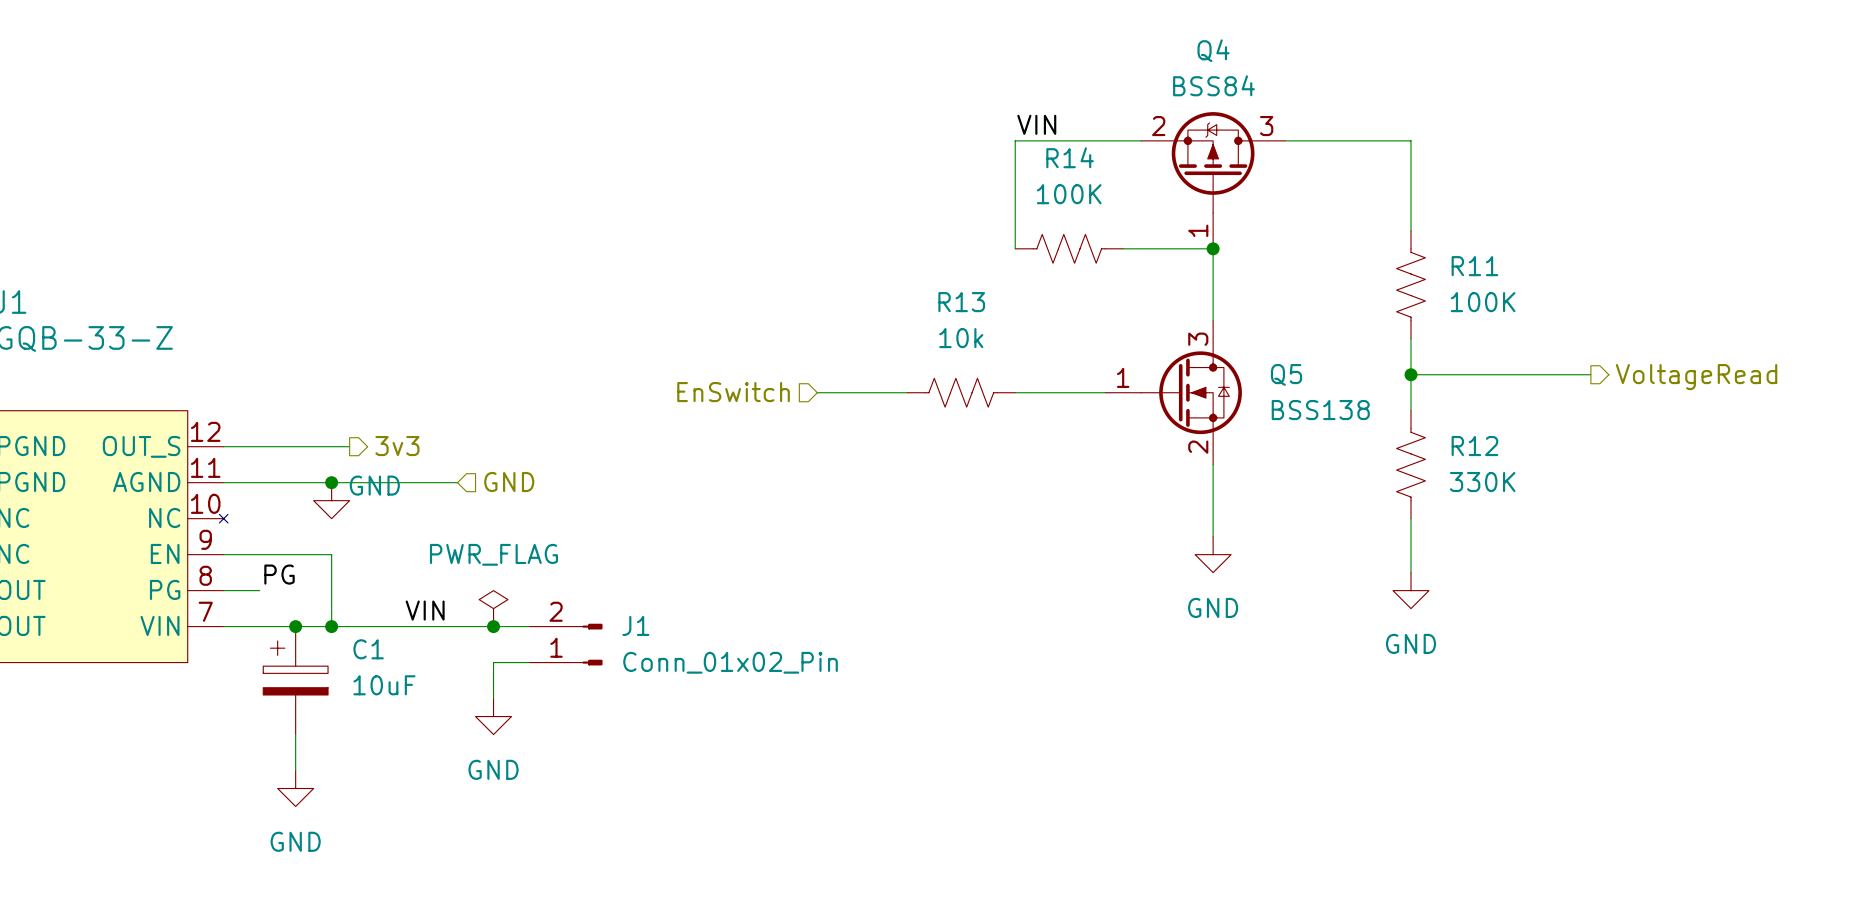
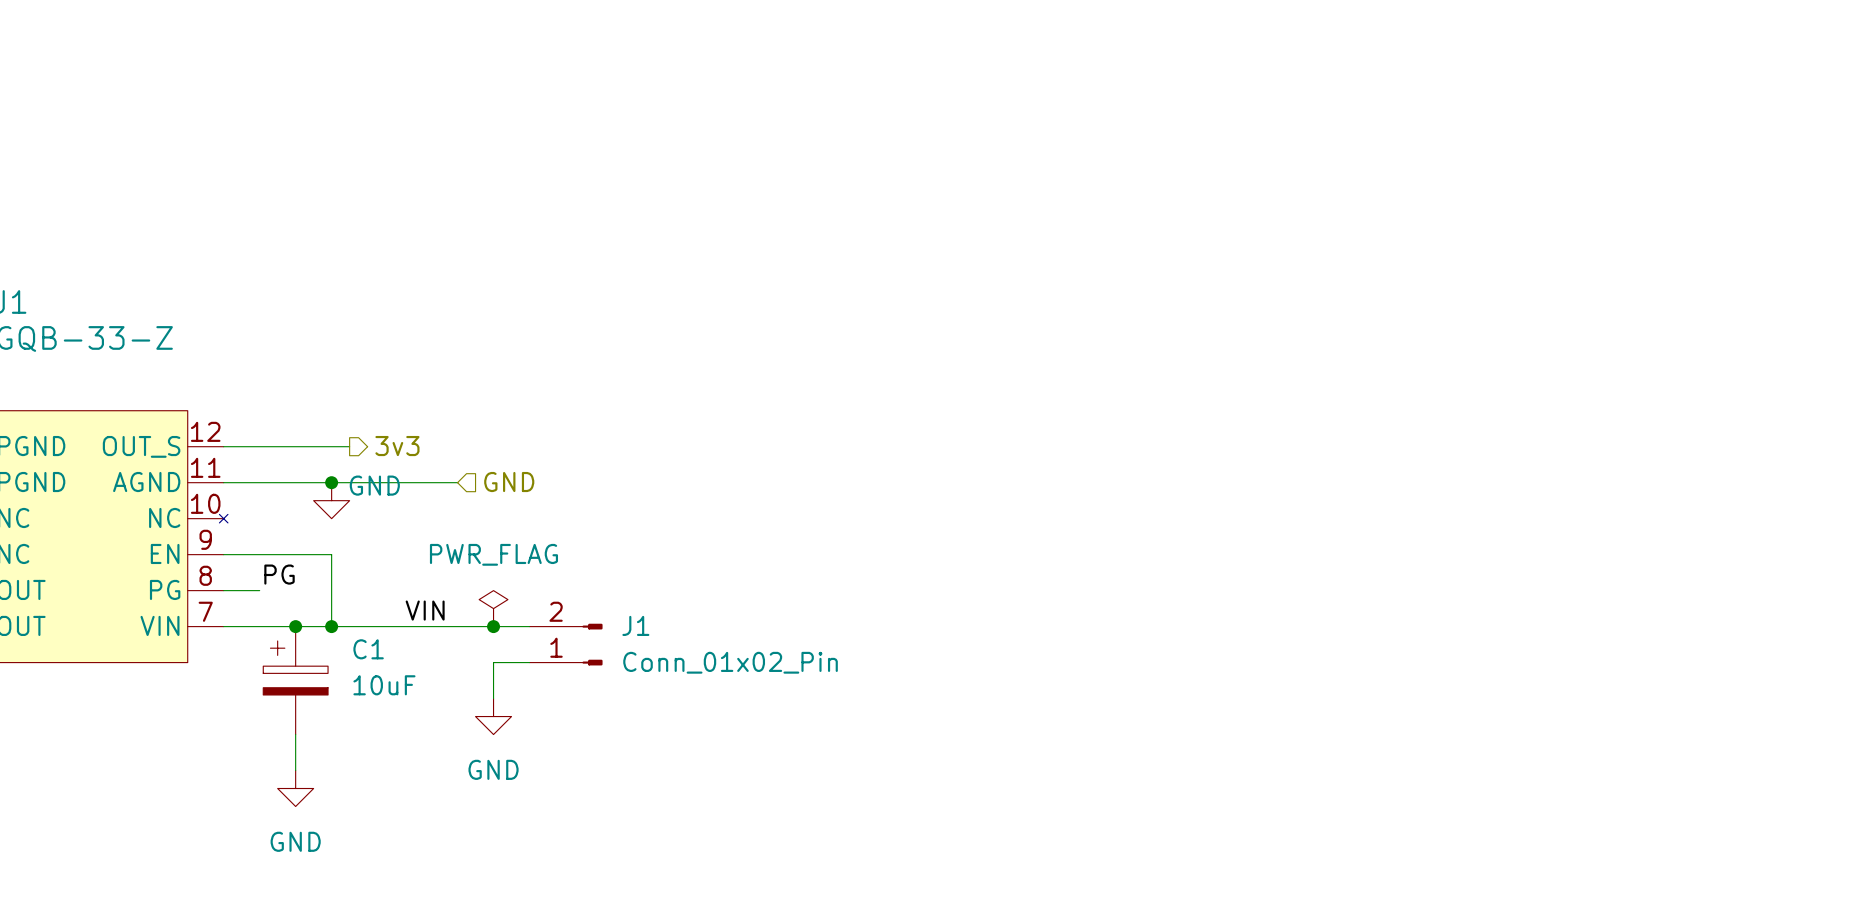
label: VIN (1036, 124) -> none
wire: (1141, 140) (1015, 140) (1015, 248) -> none
wire: (1285, 140) (1411, 140) (1411, 230) -> none
Q4: BSS84 (1213, 180) -> none
R14: 100K (1069, 248) -> none
wire: (1123, 248) (1213, 248) (1213, 320) -> none
junction: (1213, 248) -> none
R11: 100K (1411, 284) -> none
wire: (1411, 338) (1411, 410) -> none
wire: (1411, 374) (1590, 374) -> none
junction: (1411, 374) -> none
hierarchical label: VoltageRead (1696, 377) -> none
hierarchical label: EnSwitch (733, 392) -> none
wire: (817, 392) (907, 392) -> none
R13: 10k (961, 392) -> none
wire: (1015, 392) (1105, 392) -> none
Q5: BSS138 (1173, 392) -> none
wire: (1213, 464) (1213, 536) -> none
R12: 330K (1411, 464) -> none
wire: (1411, 518) (1411, 572) -> none
power symbol: GND (1213, 554) -> none
power symbol: GND (1411, 590) -> none

